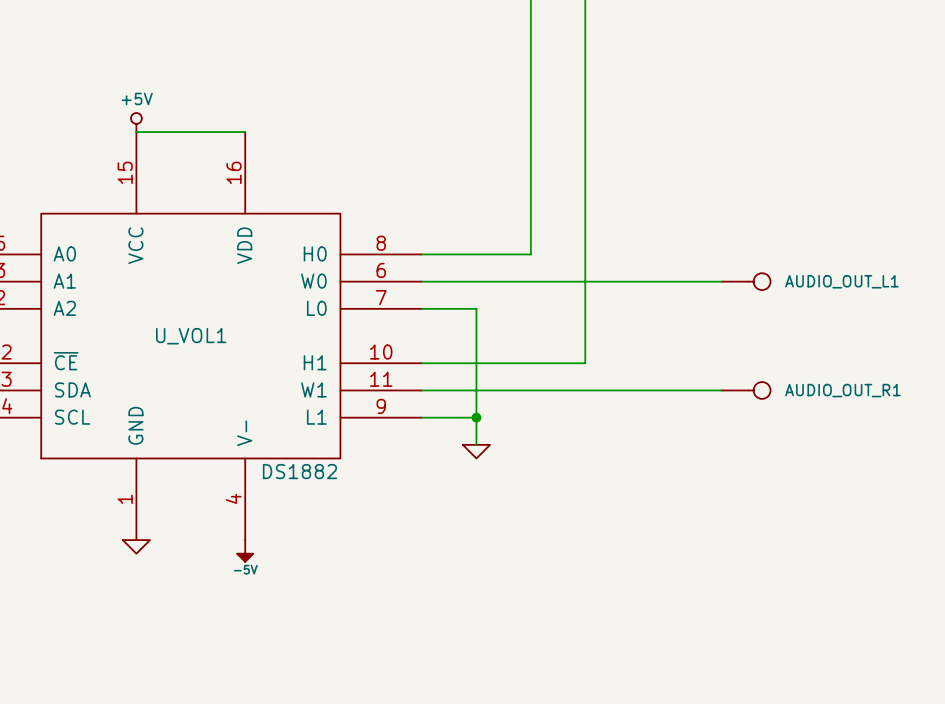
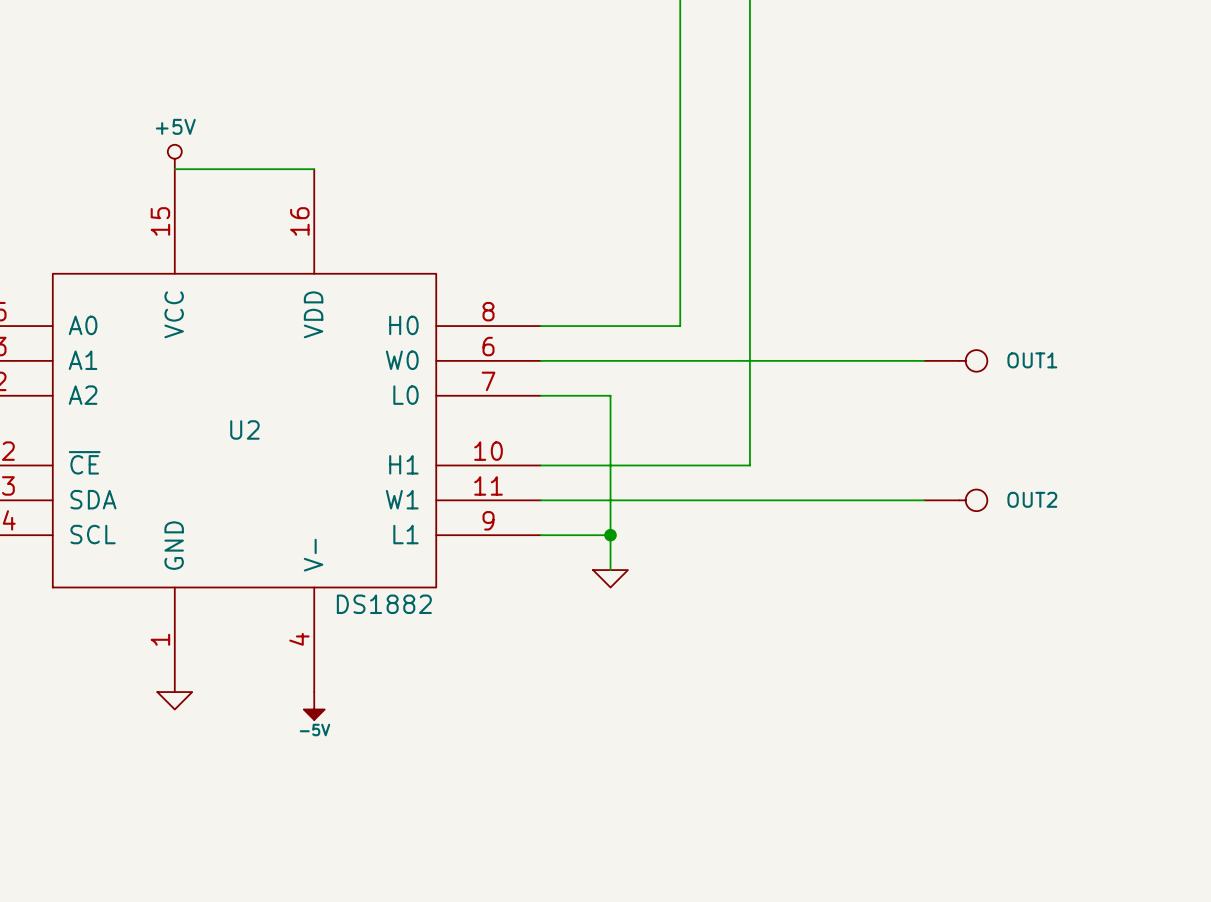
AUDIO_OUT_L1 name: AUDIO_OUT_L1 (841, 281) -> OUT1 (1032, 360)
U_VOL1 name: U_VOL1 (191, 336) -> U2 (244, 429)
AUDIO_OUT_R1 name: AUDIO_OUT_R1 (842, 390) -> OUT2 (1032, 499)

